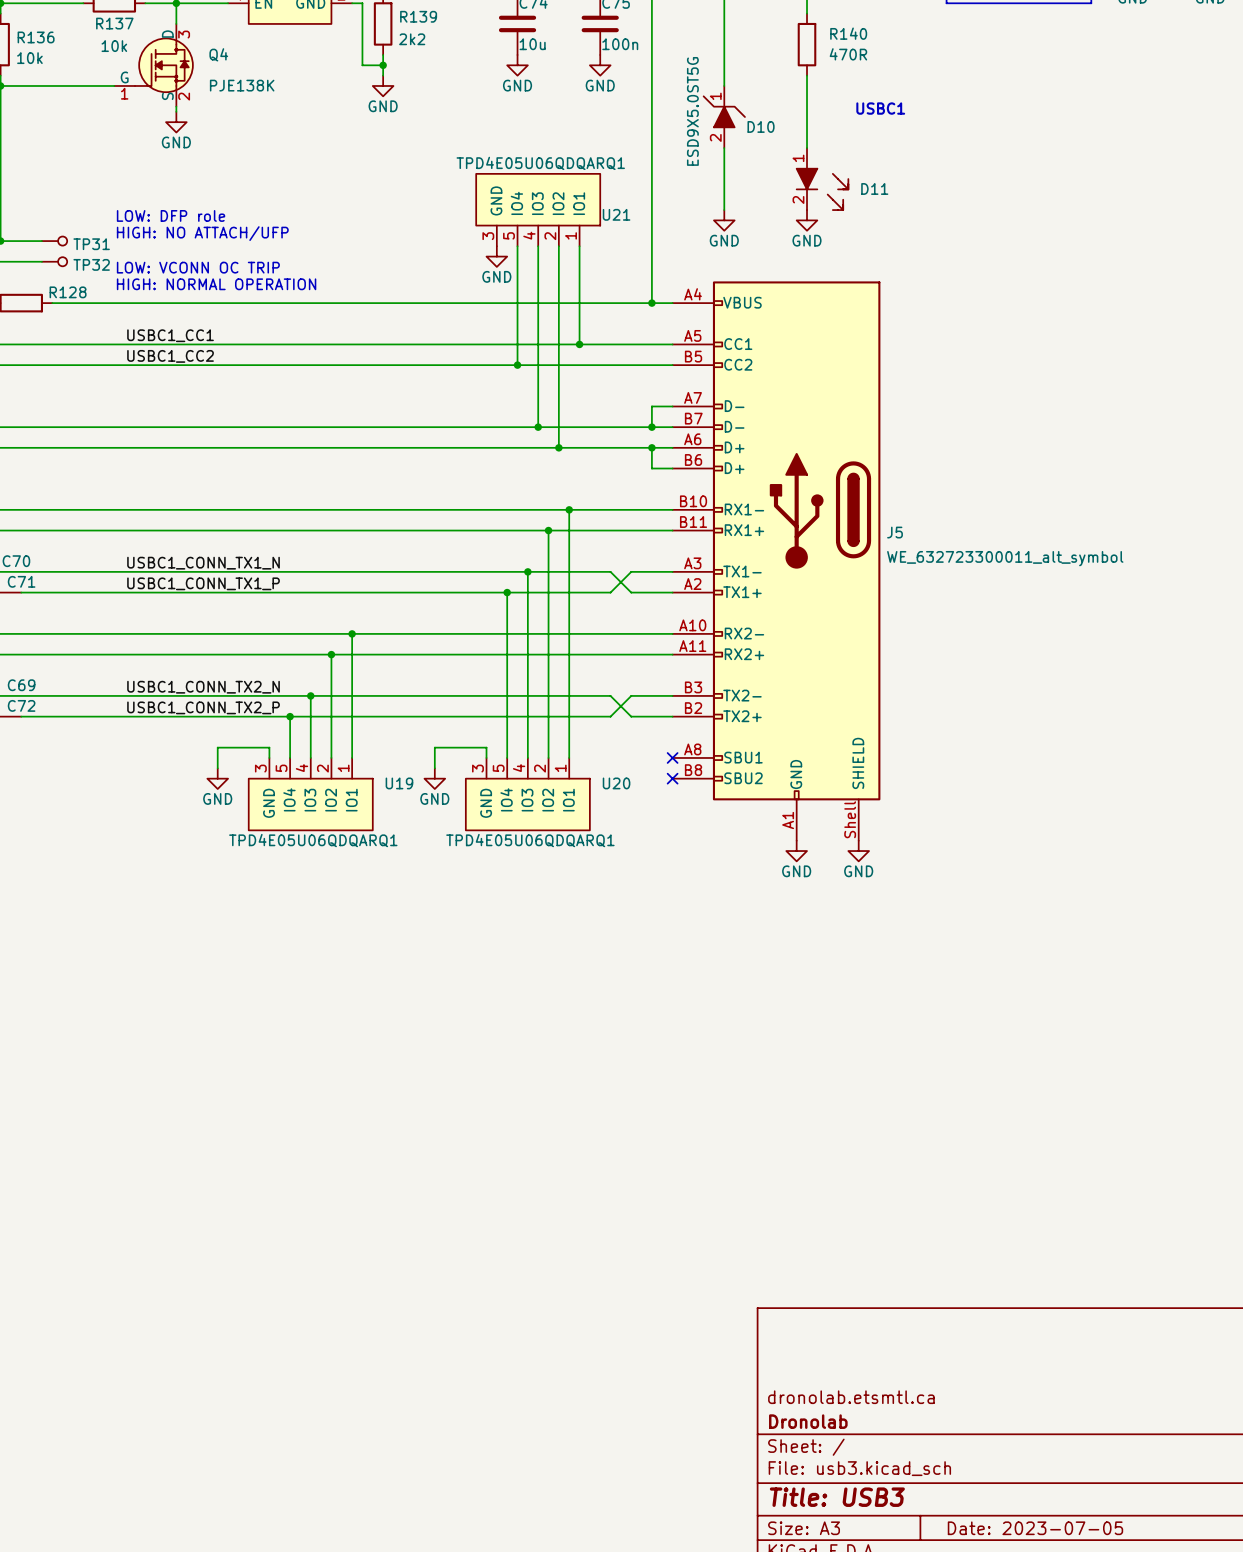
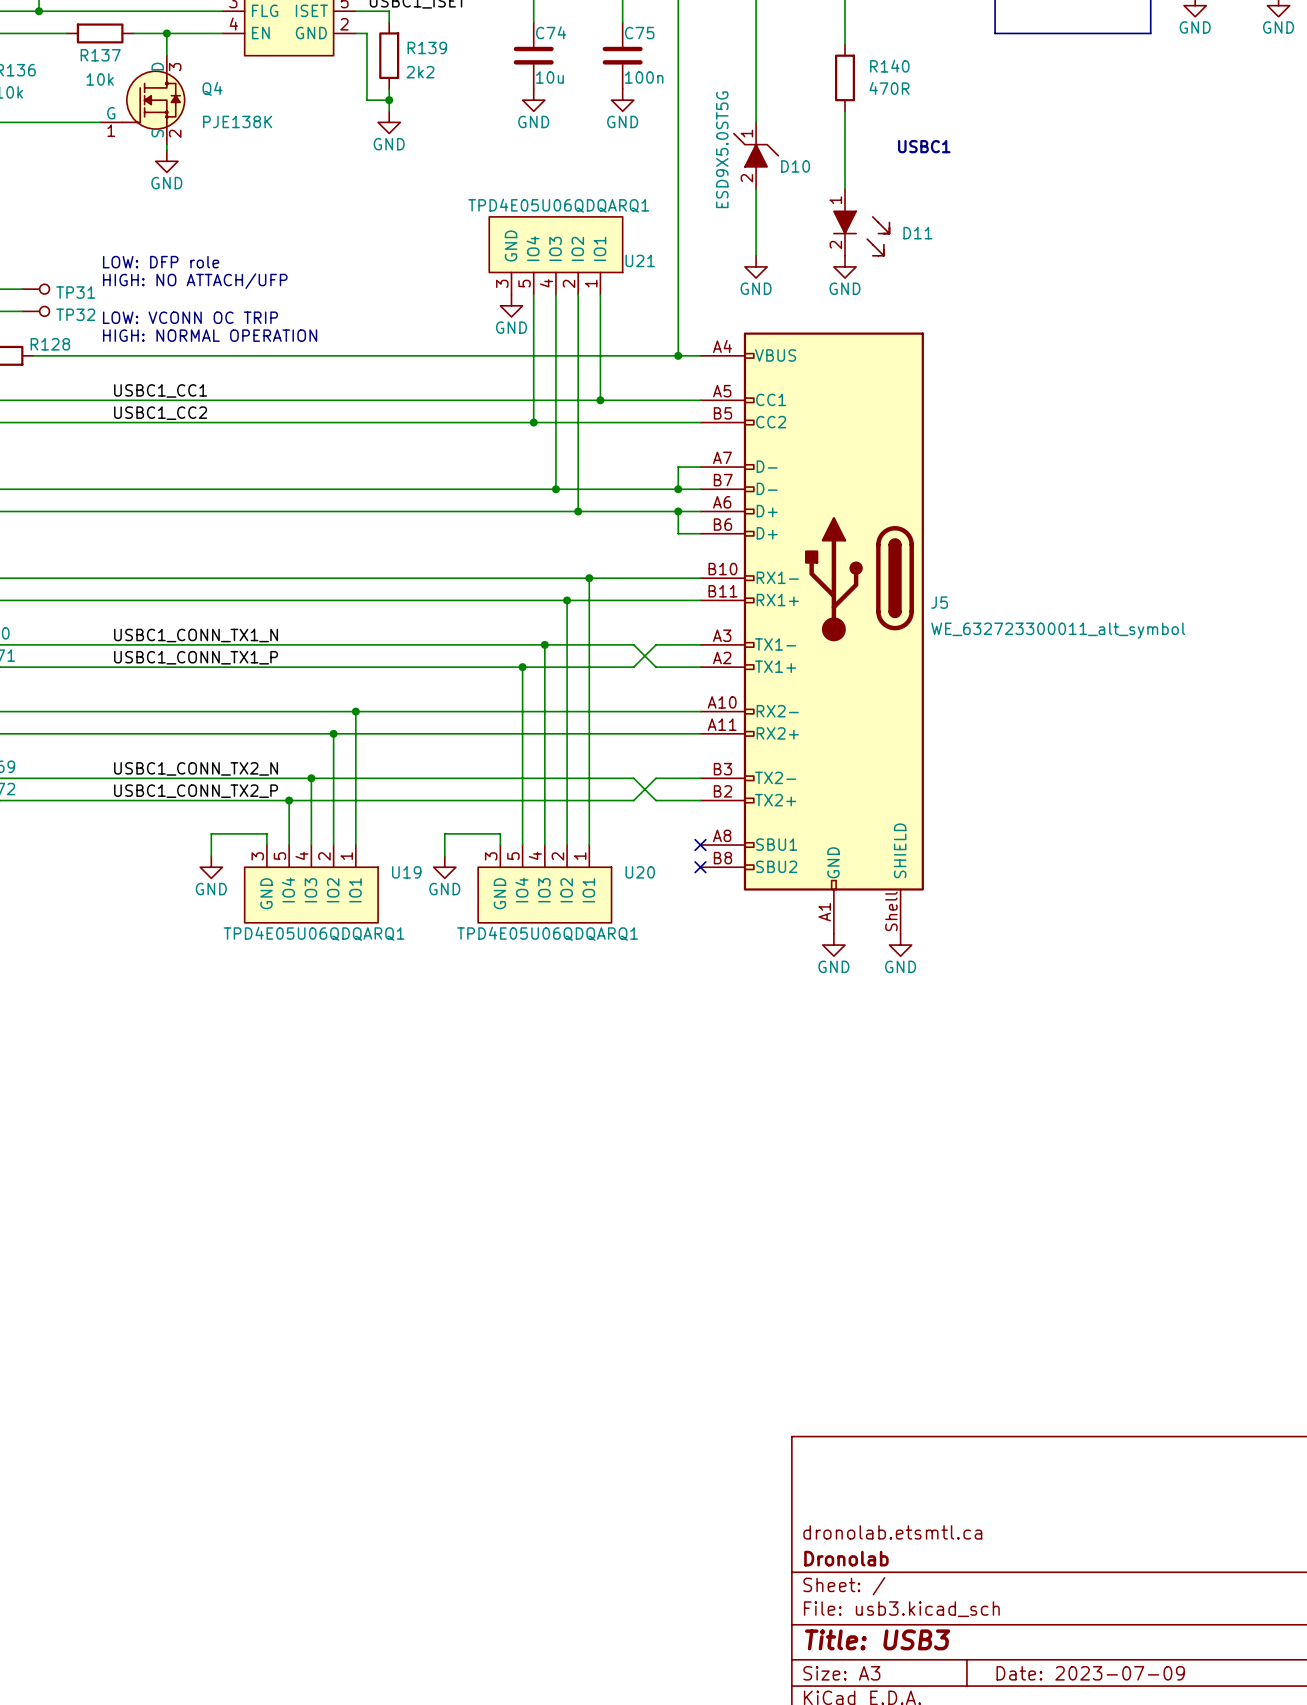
title block: Date: 2023-07-05 (1035, 1528) -> Date: 2023-07-09 (1090, 1673)

